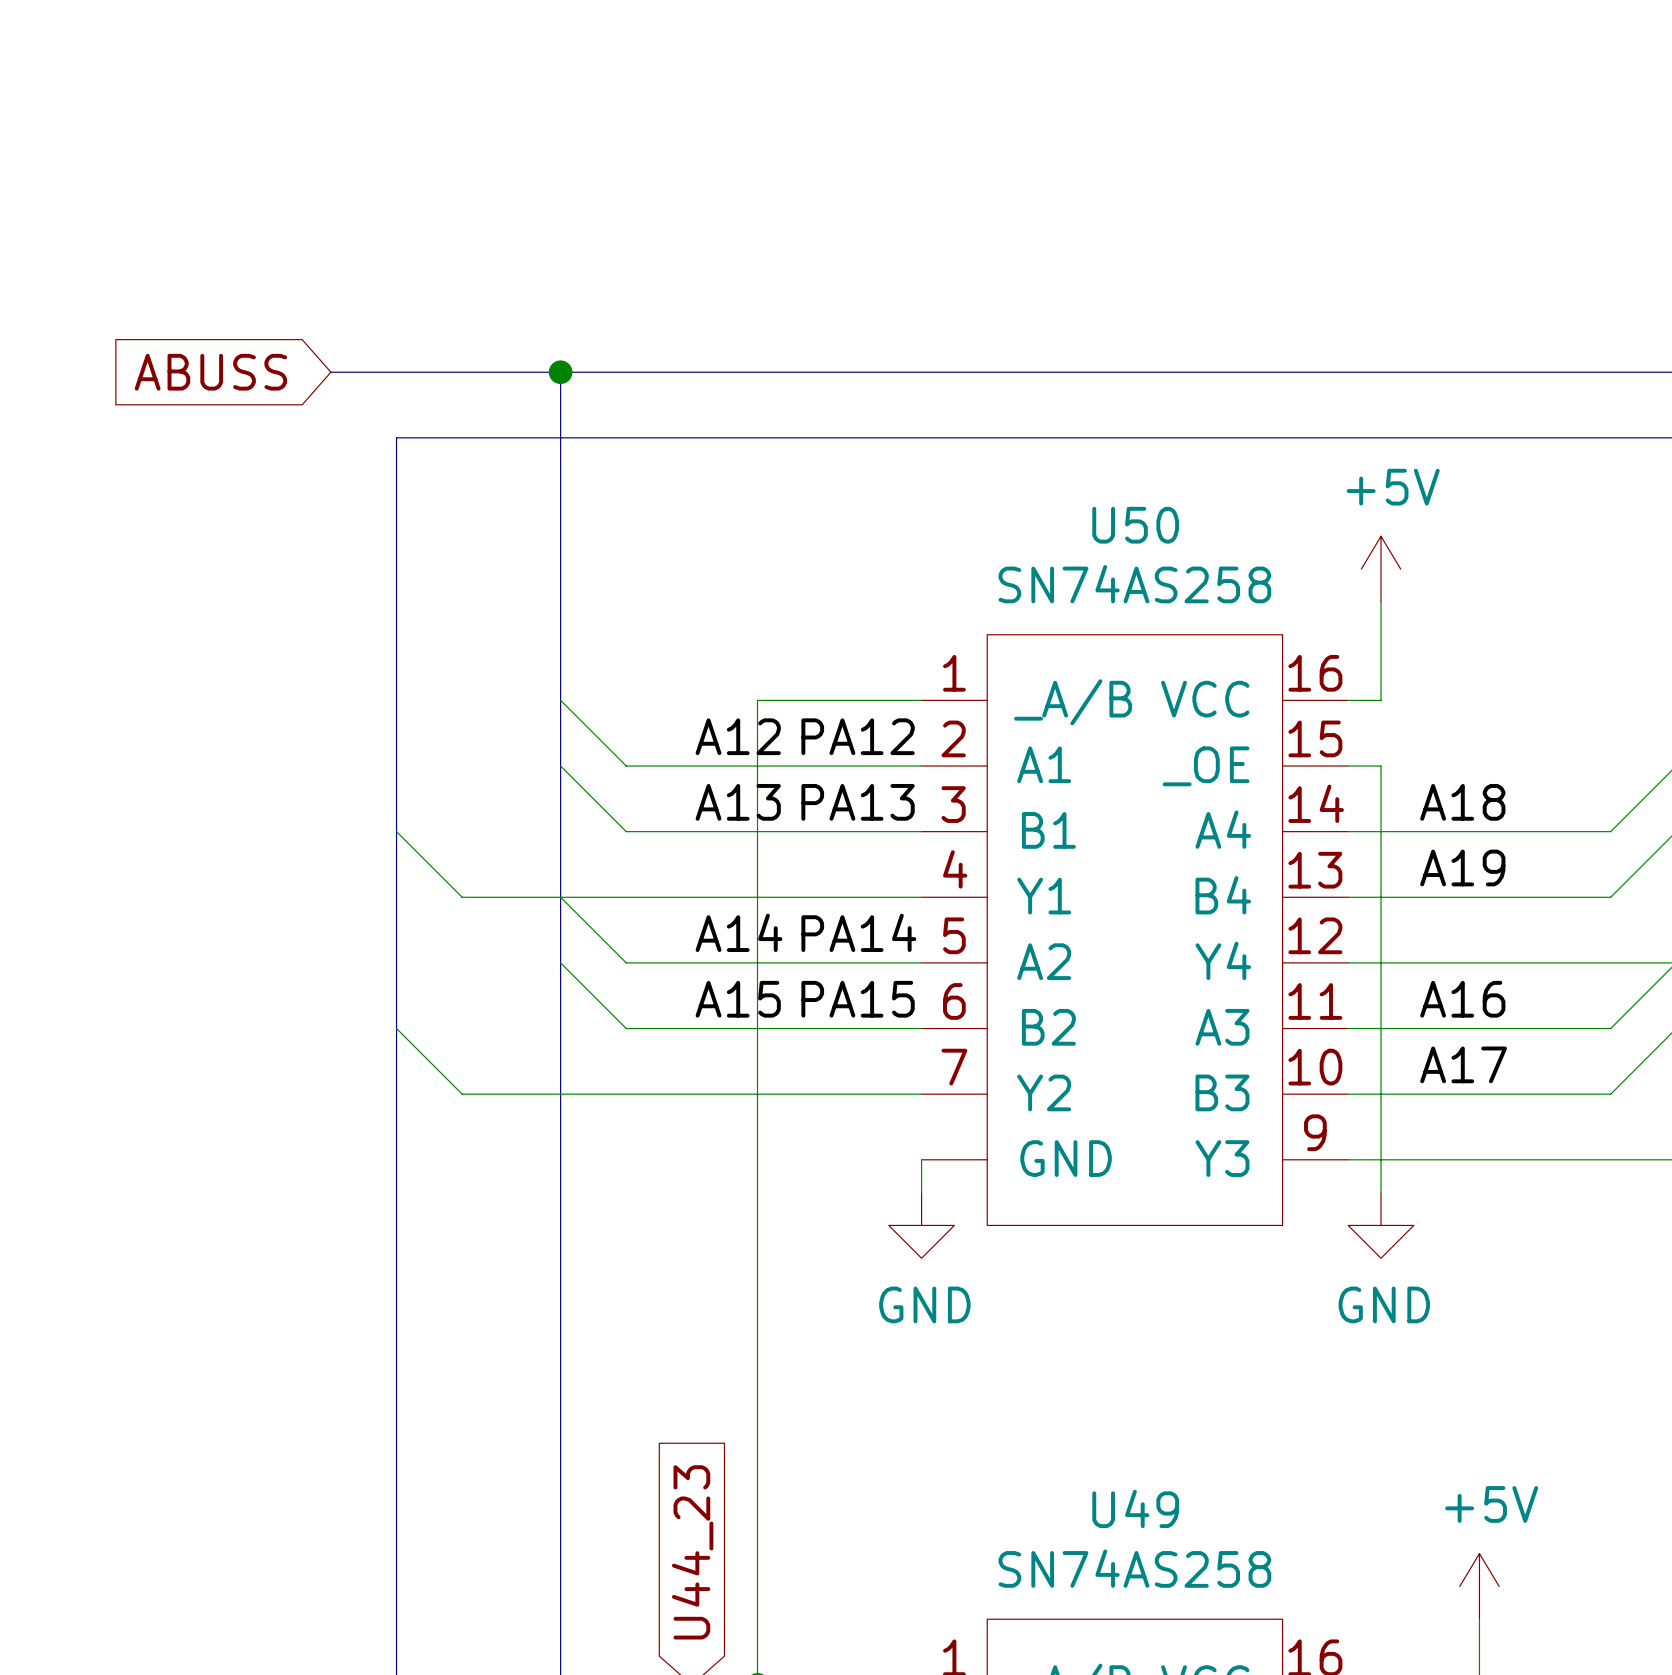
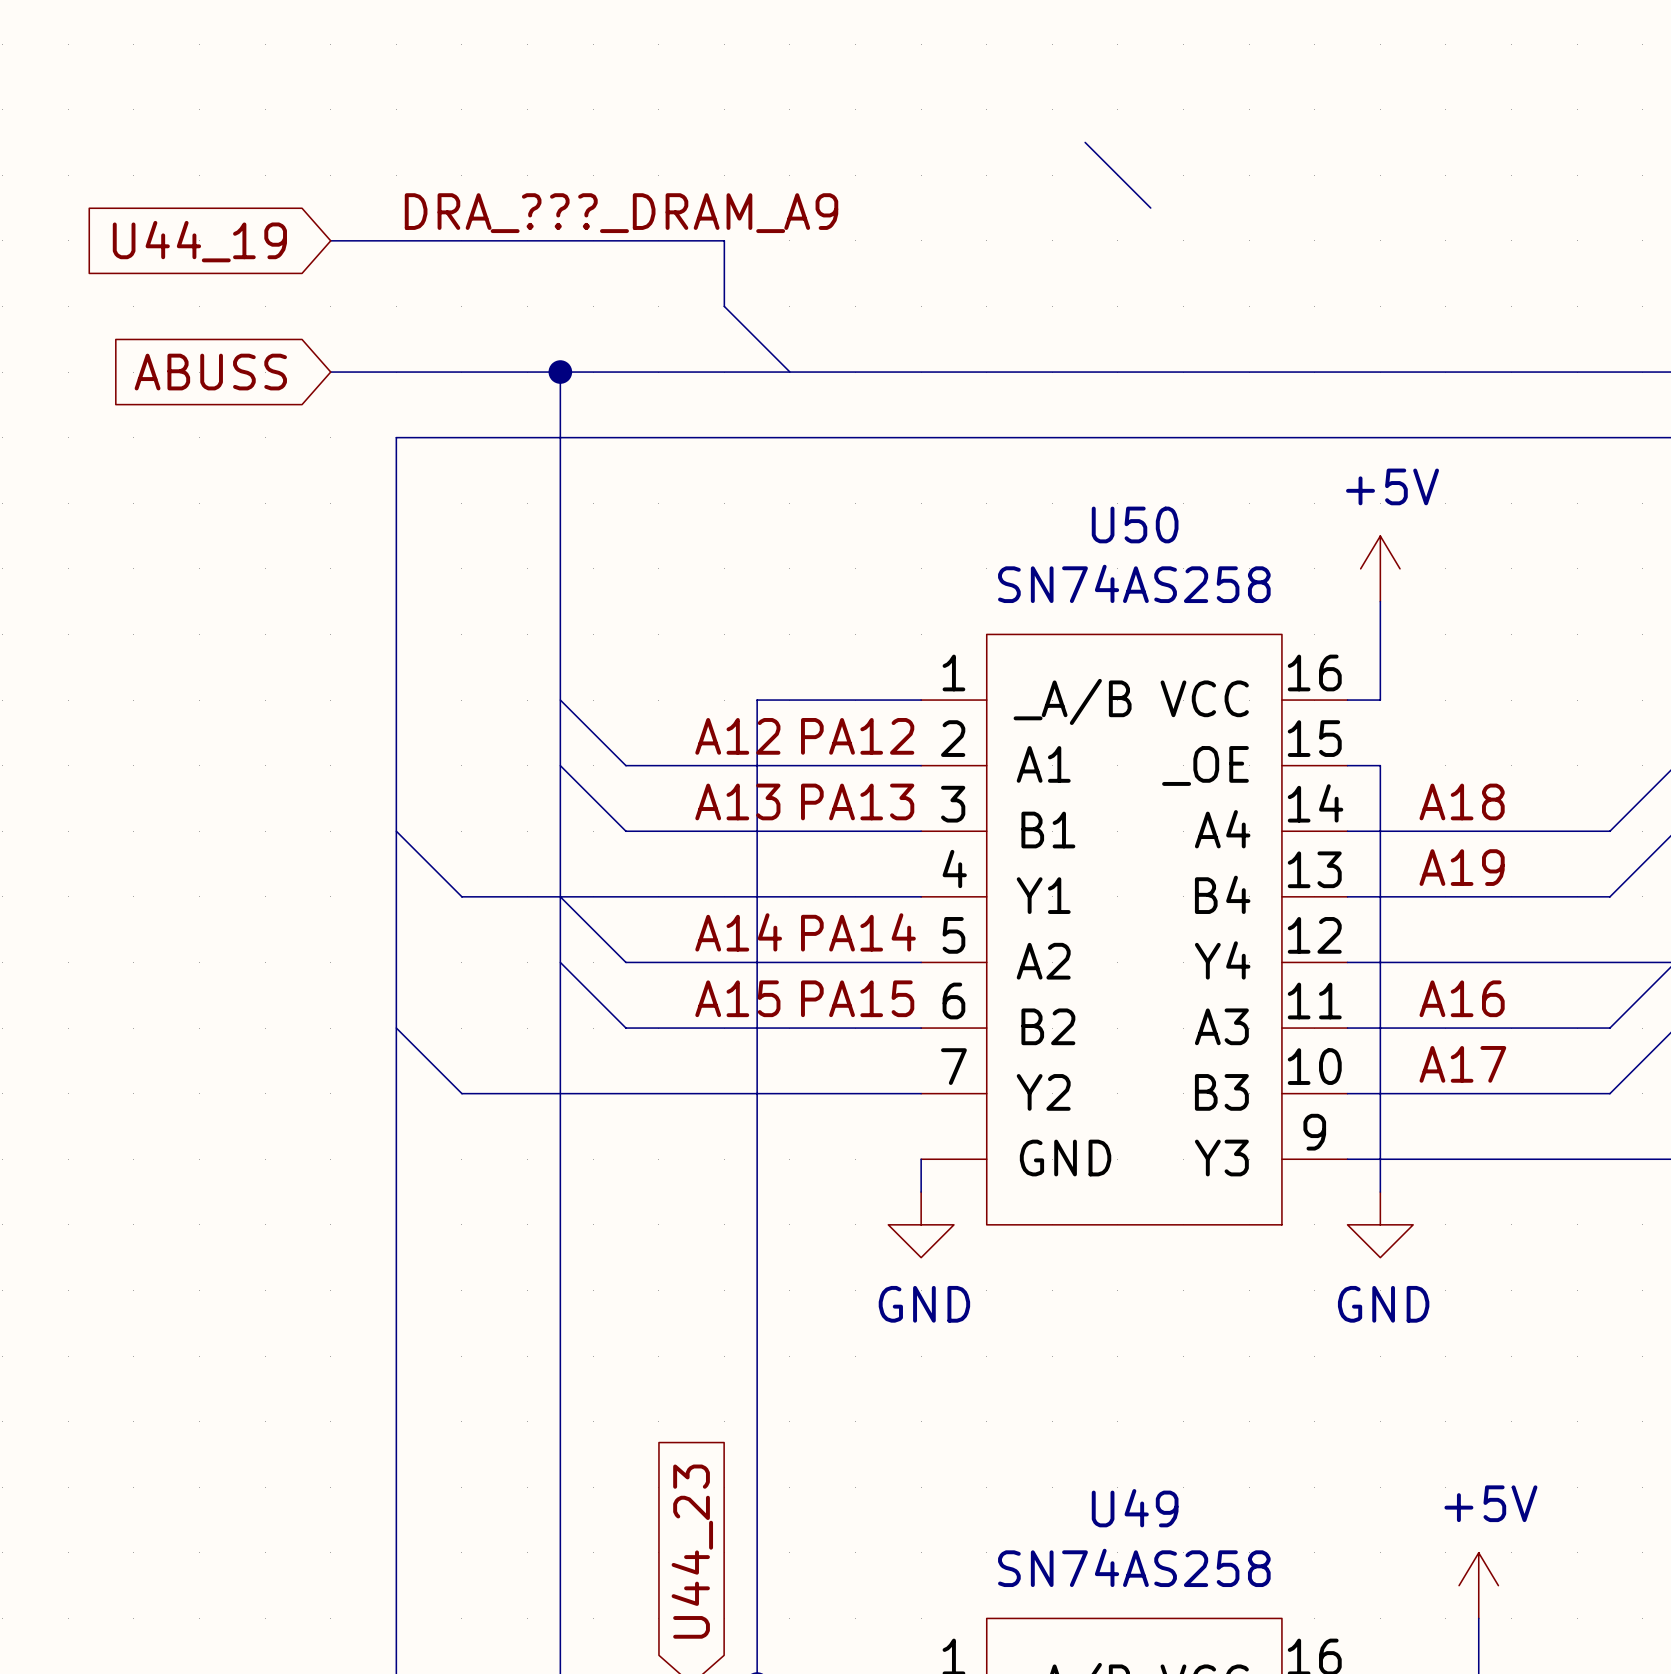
wire: none -> (1085, 142) (1150, 208)
label: none -> DRA_???_DRAM_A9 (621, 213)
wire: none -> (330, 240) (724, 240) (724, 306) (789, 372)
global label: none -> U44_19 (199, 241)

